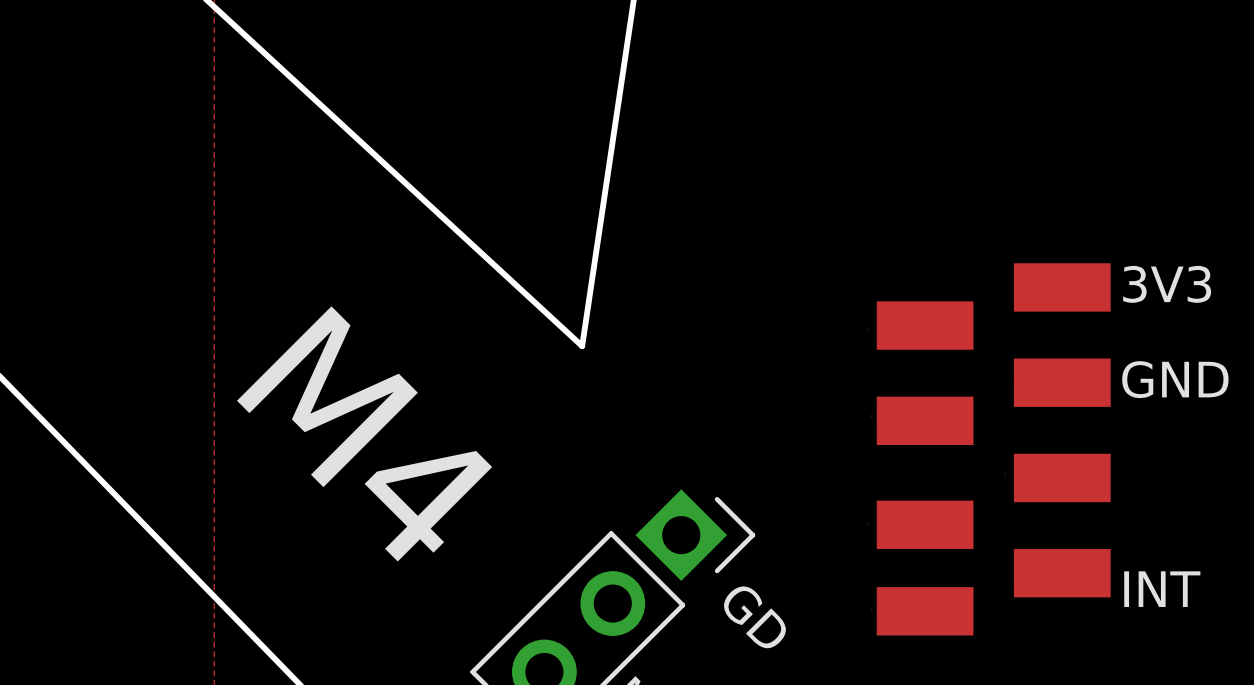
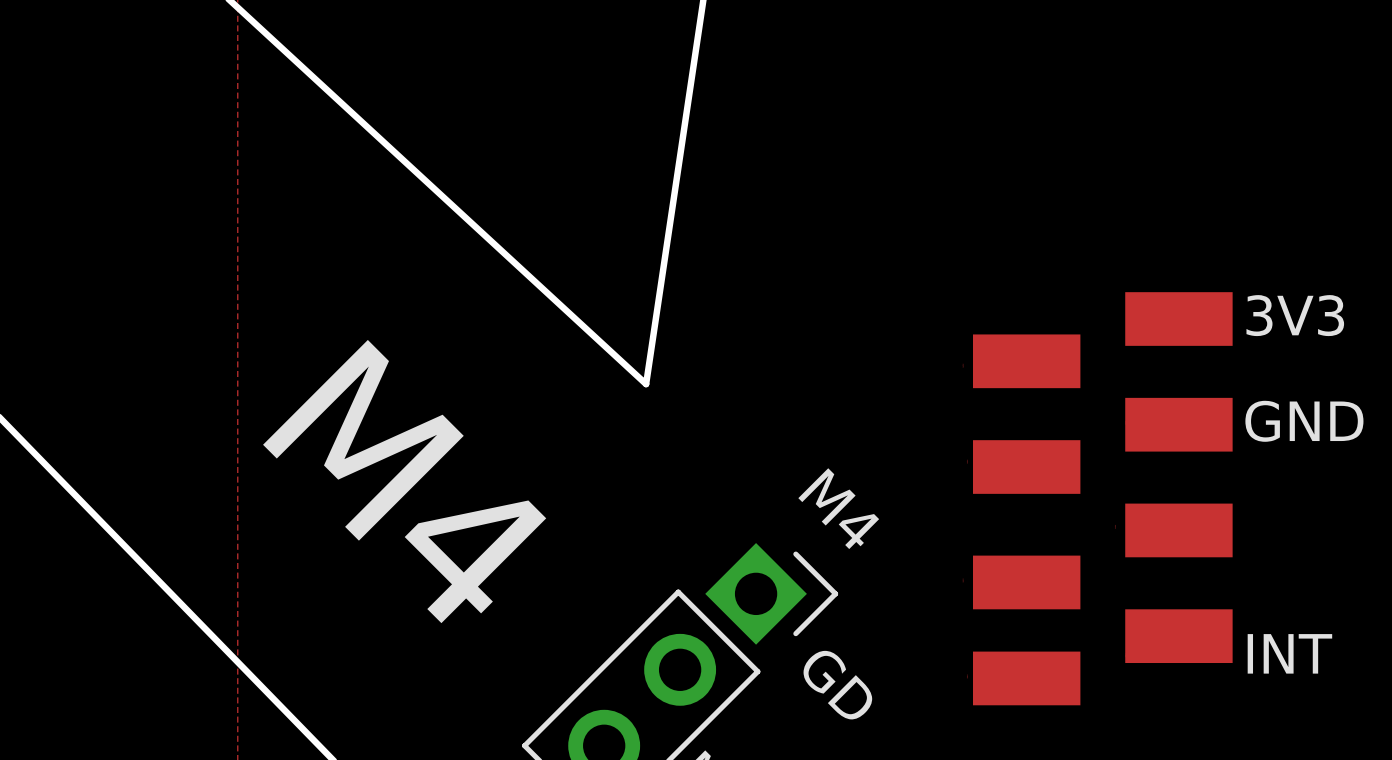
M4 name: none -> M4 (838, 508)

